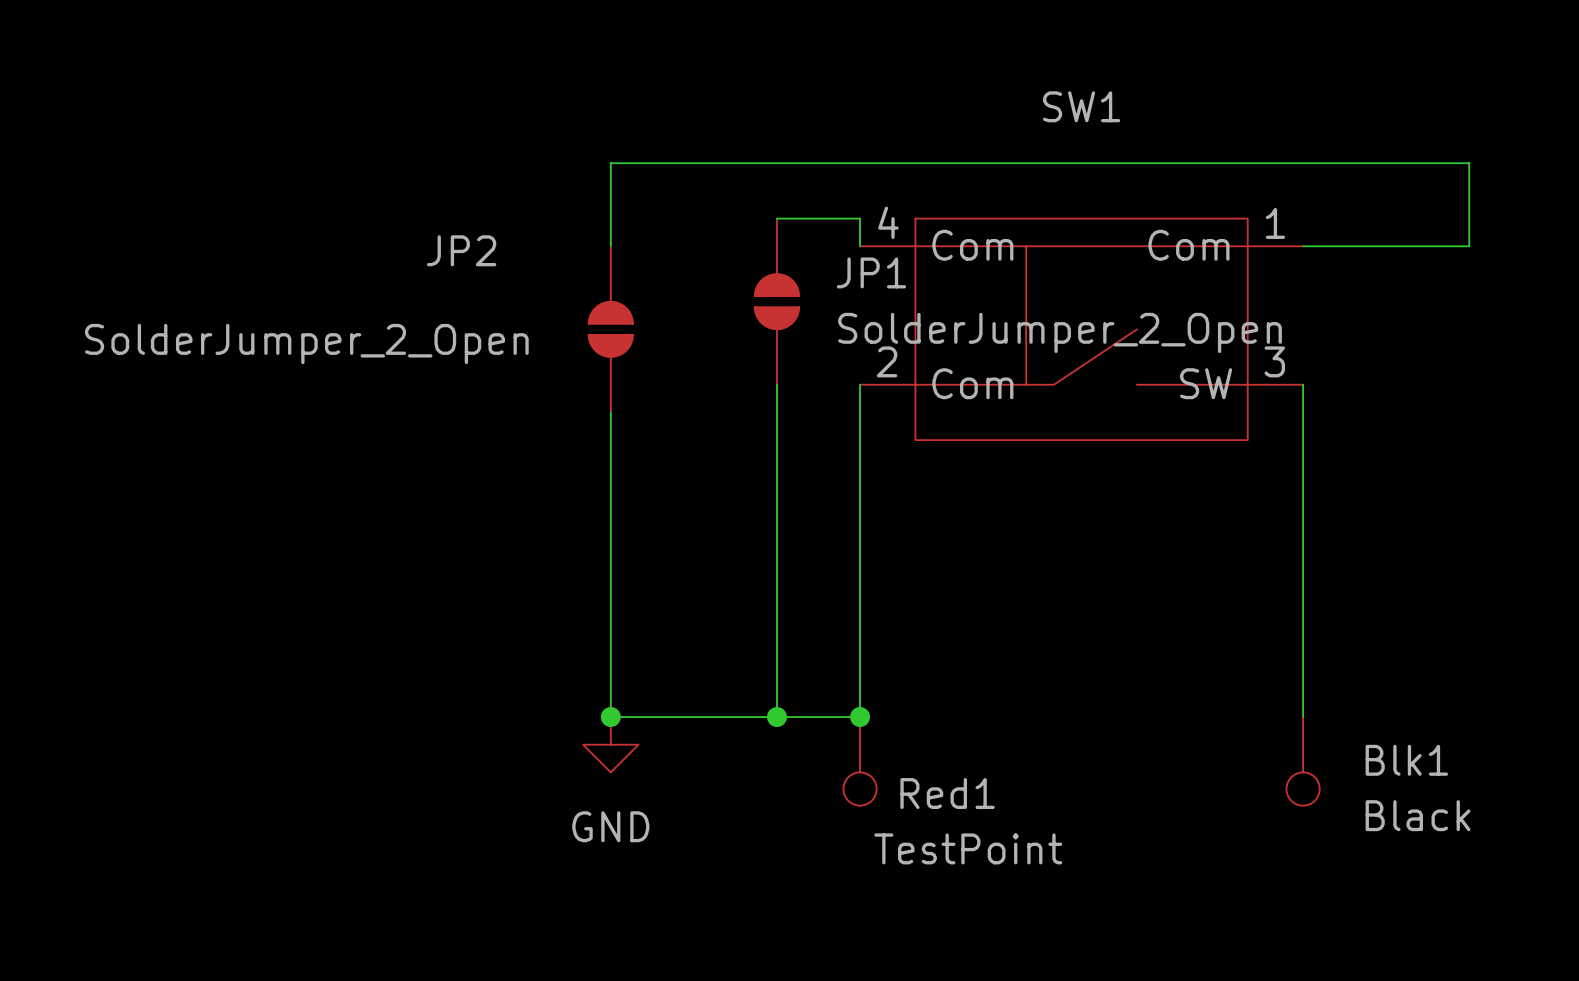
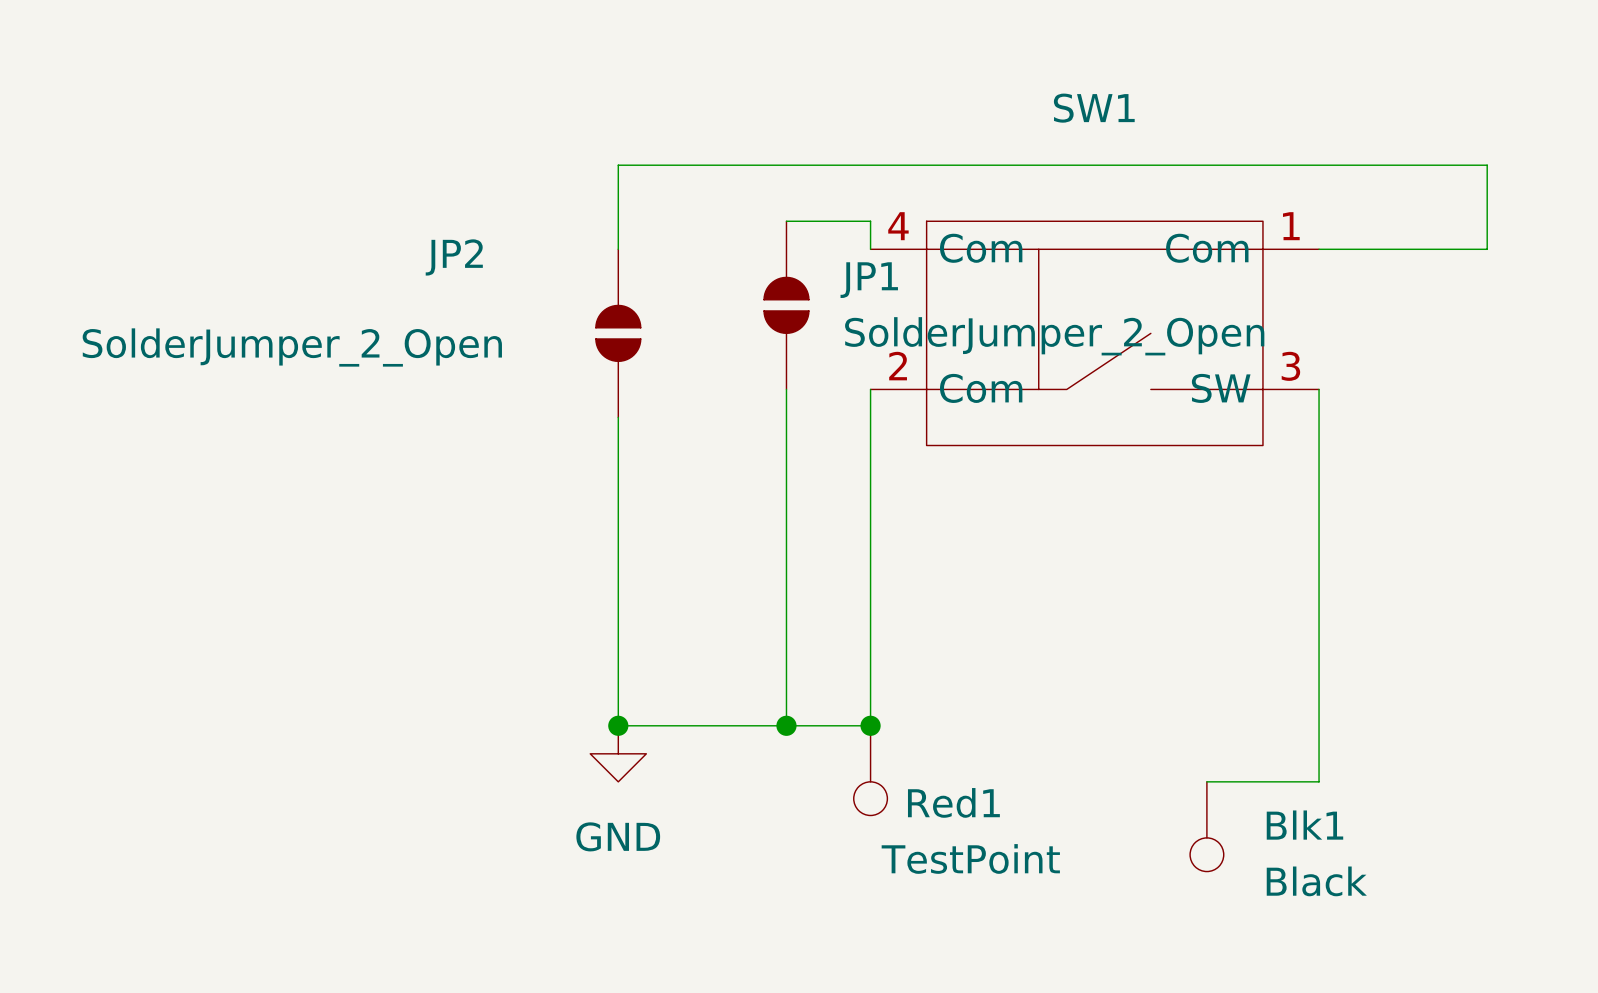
wire: none -> (1319, 725) (1319, 781) (1206, 781)
Blk1 position: (1303, 761) -> (1206, 826)

